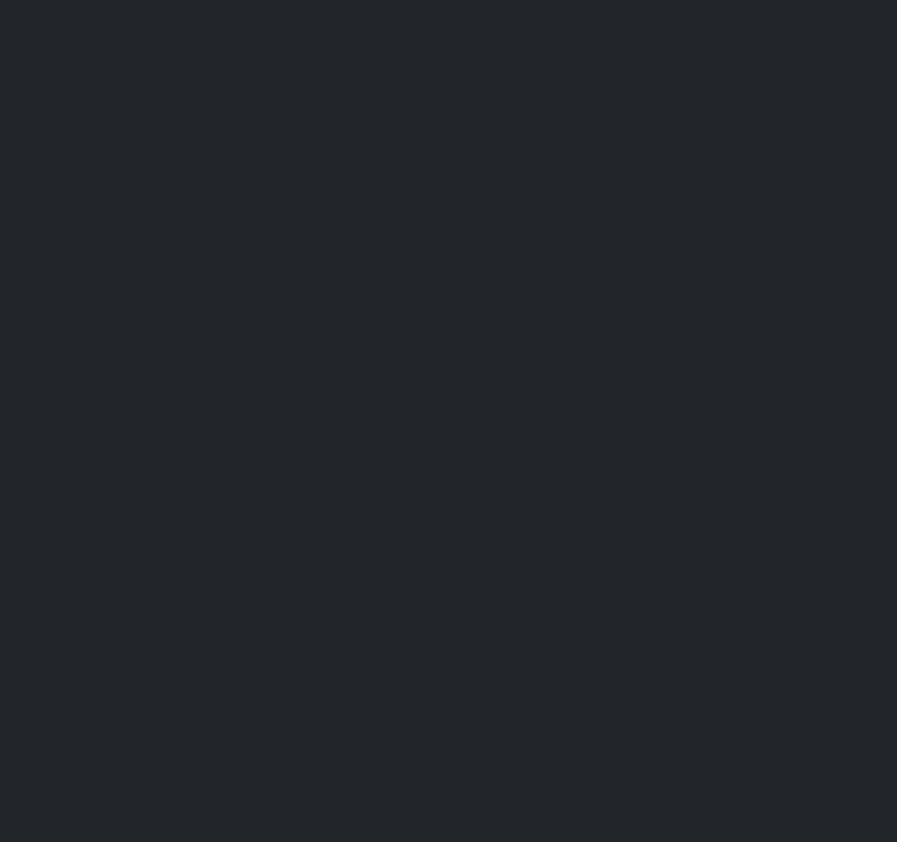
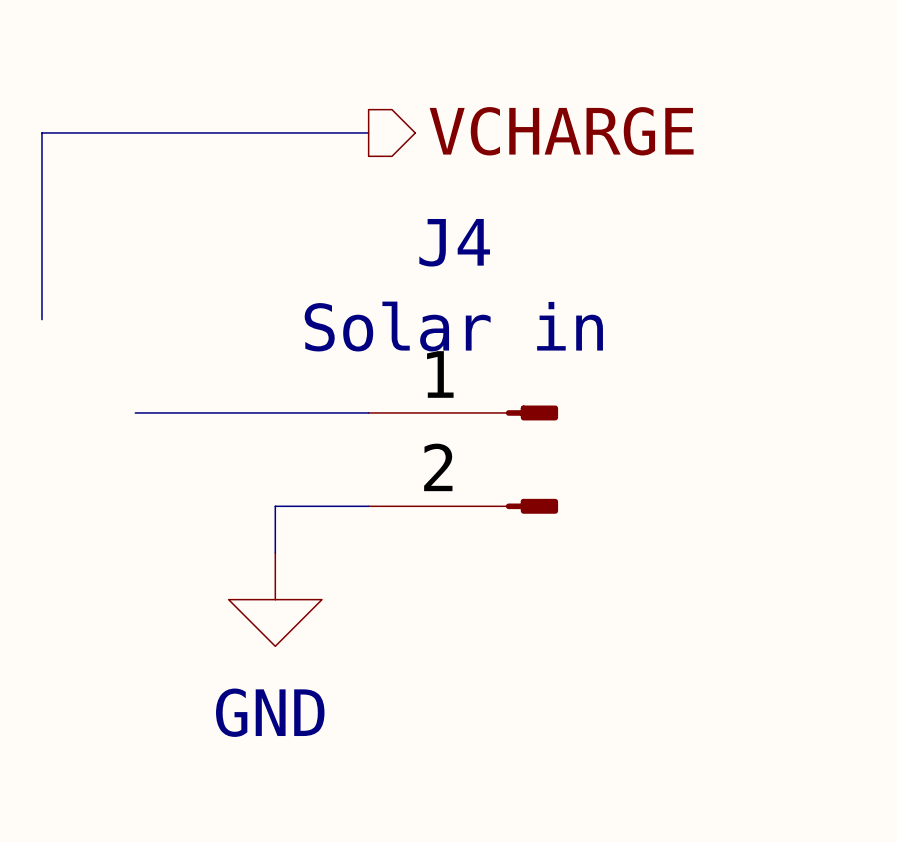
hierarchical label: none -> VCHARGE (561, 131)
wire: none -> (368, 132) (41, 132) (41, 319)
wire: none -> (135, 412) (368, 412)
J4: none -> Solar in (463, 459)
wire: none -> (368, 506) (275, 506) (275, 552)
power symbol: none -> GND (275, 599)

